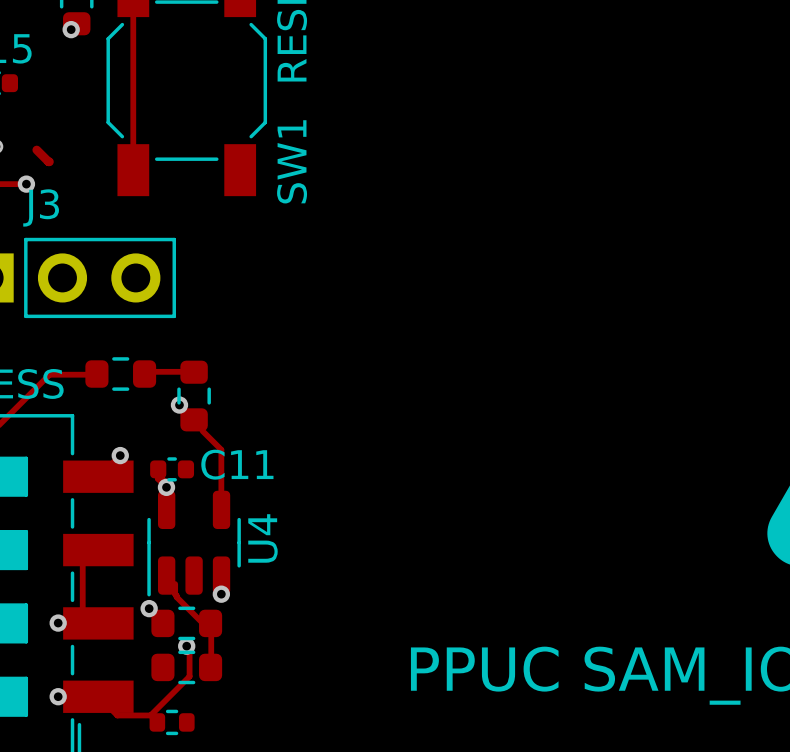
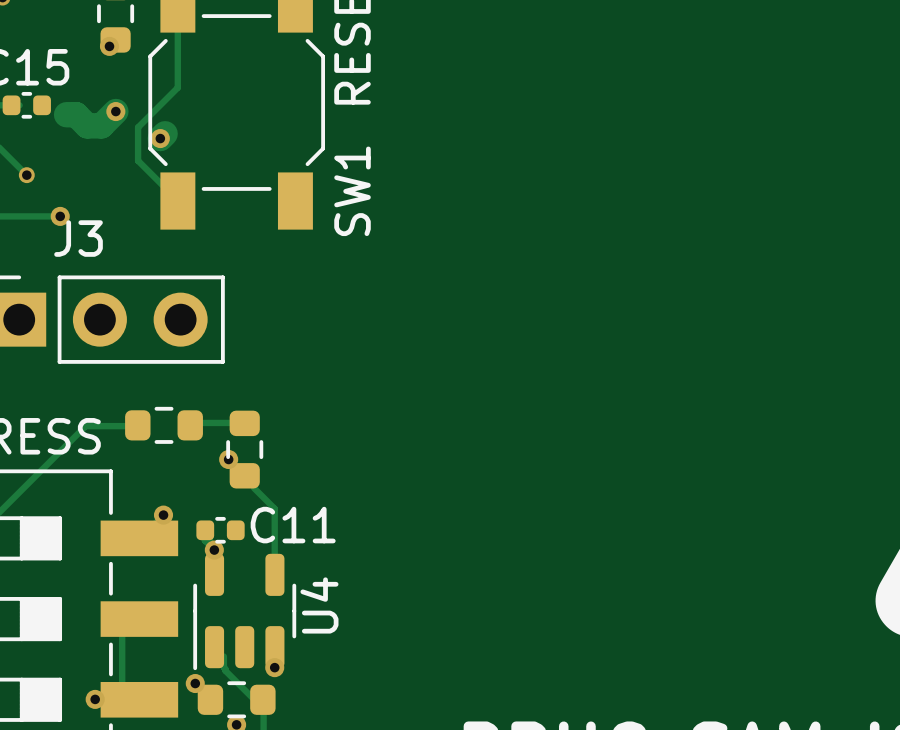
track: (133, 67) (133, 169) -> (177, 87) (138, 127) (138, 160) (177, 200)
track: none -> (115, 111) (101, 125) (87, 125) (76, 114) (66, 114)
via: none -> (115, 111)
track: none -> (165, 133) (160, 138)
via: none -> (160, 138)
track: (36, 149) (49, 161) -> none

